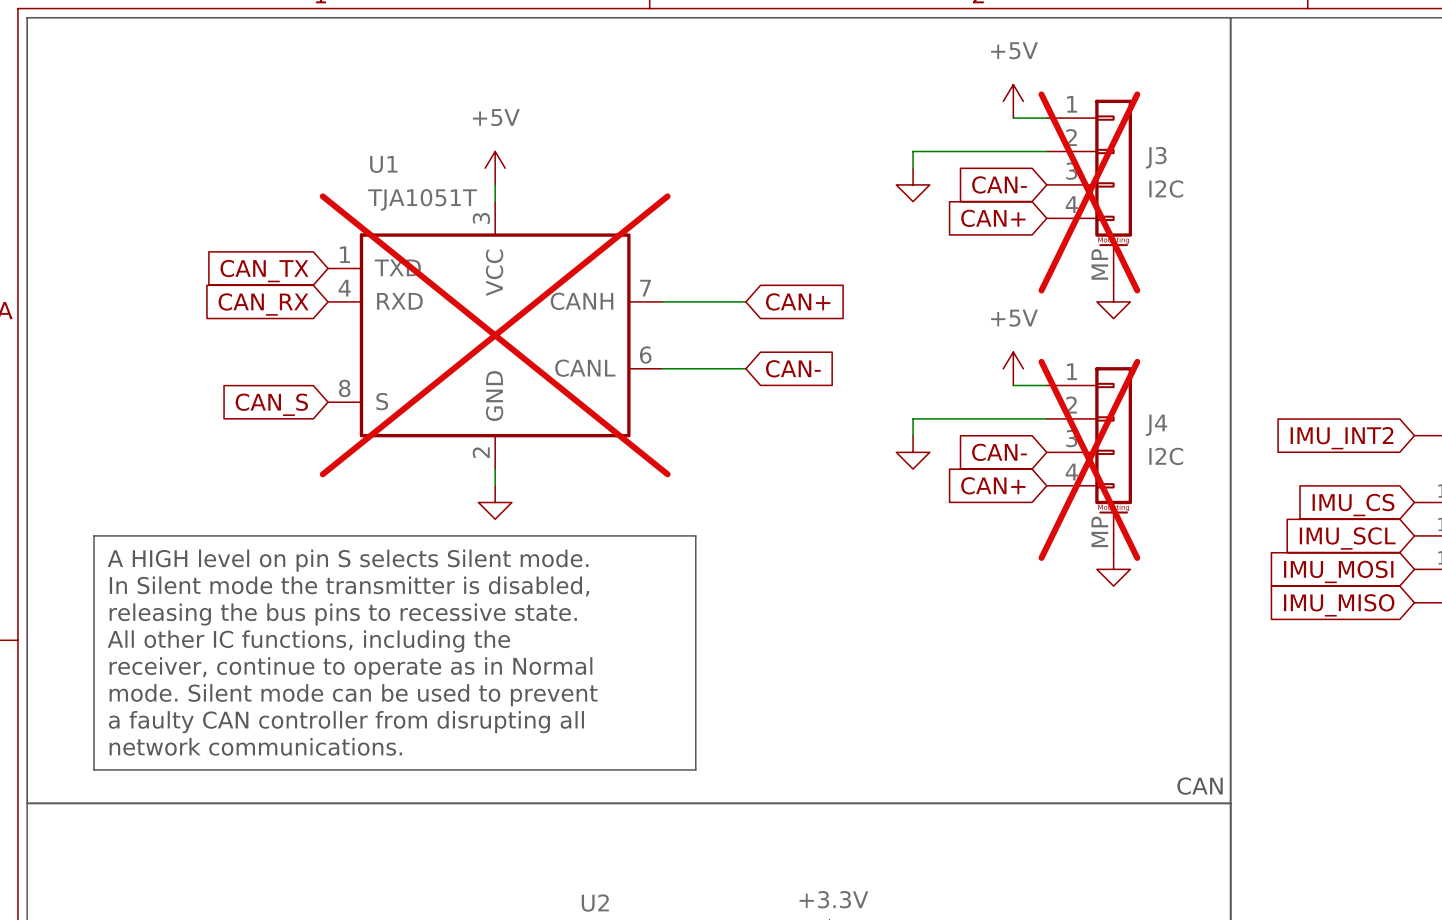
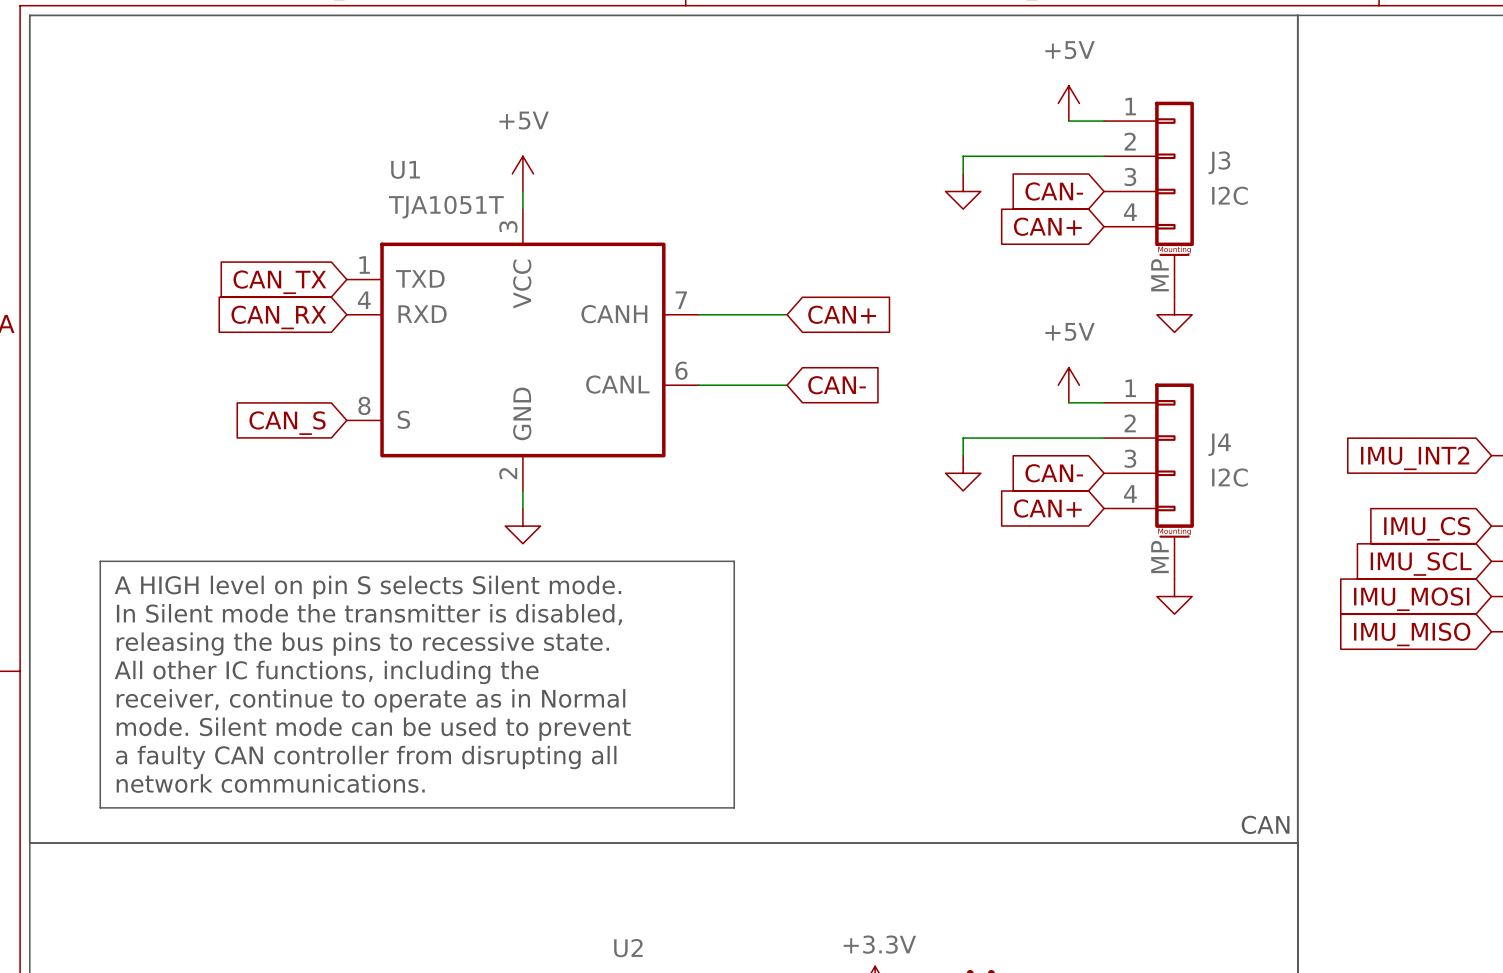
J3 do-not-place cross: (1089, 192) -> none
U1 do-not-place cross: (495, 335) -> none
J4 do-not-place cross: (1089, 459) -> none

